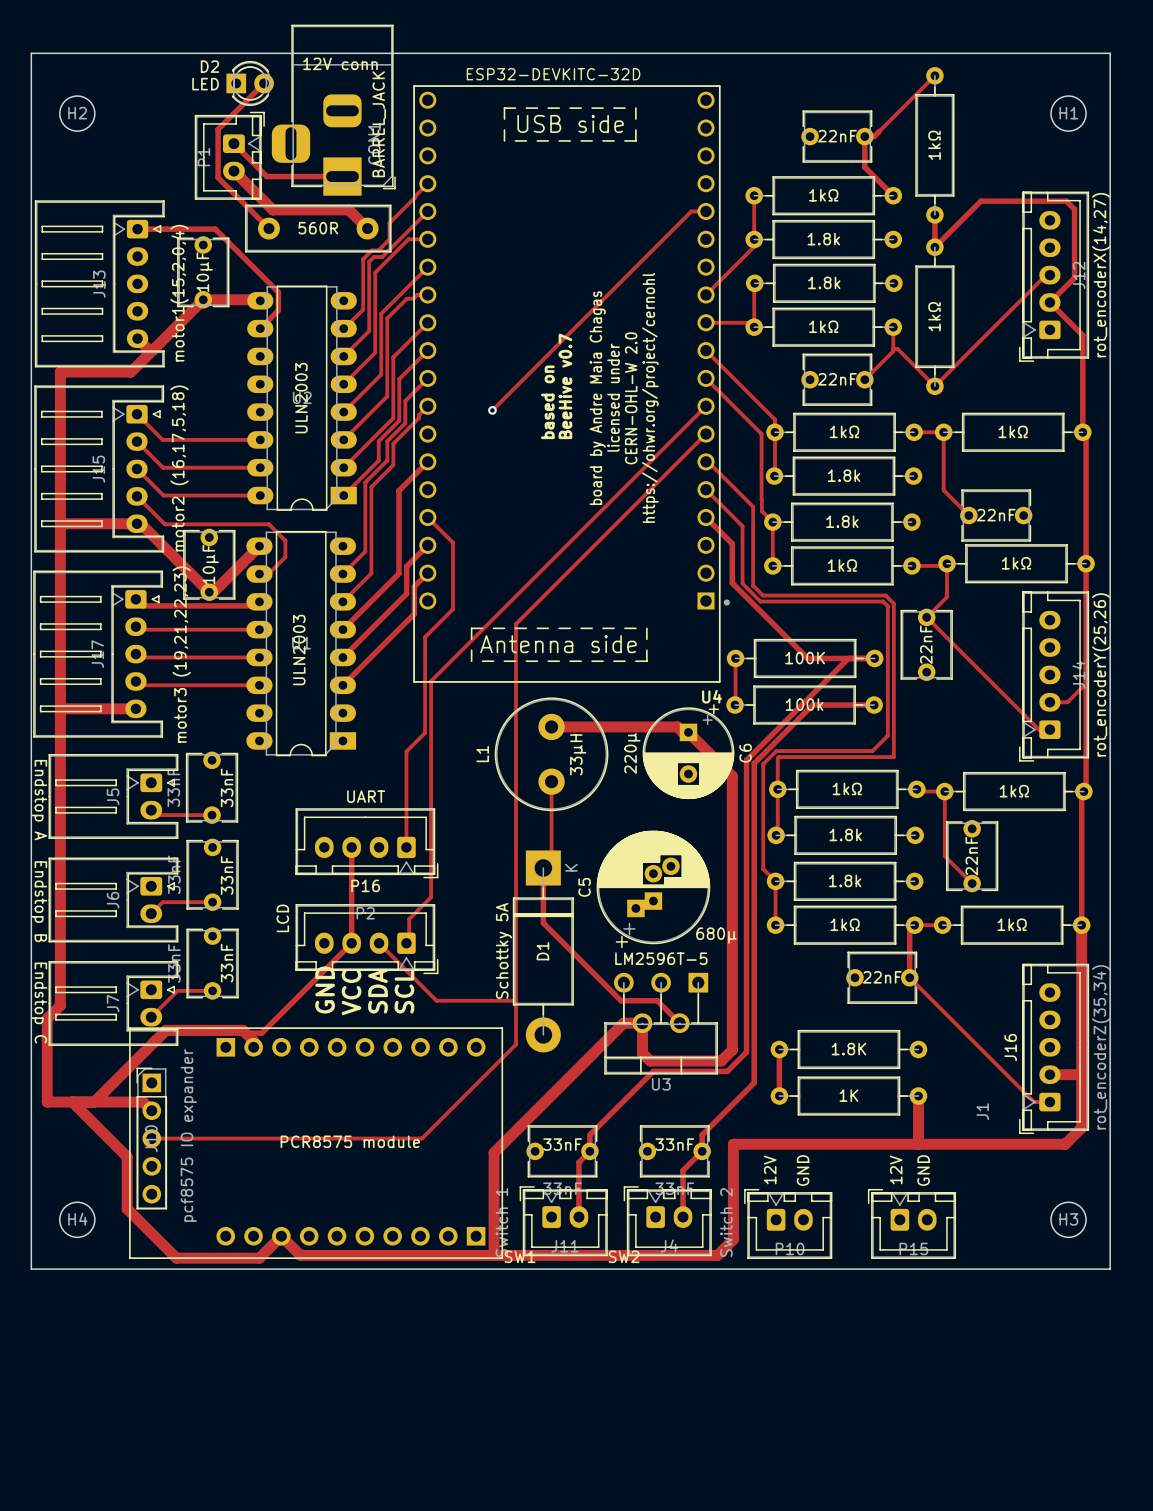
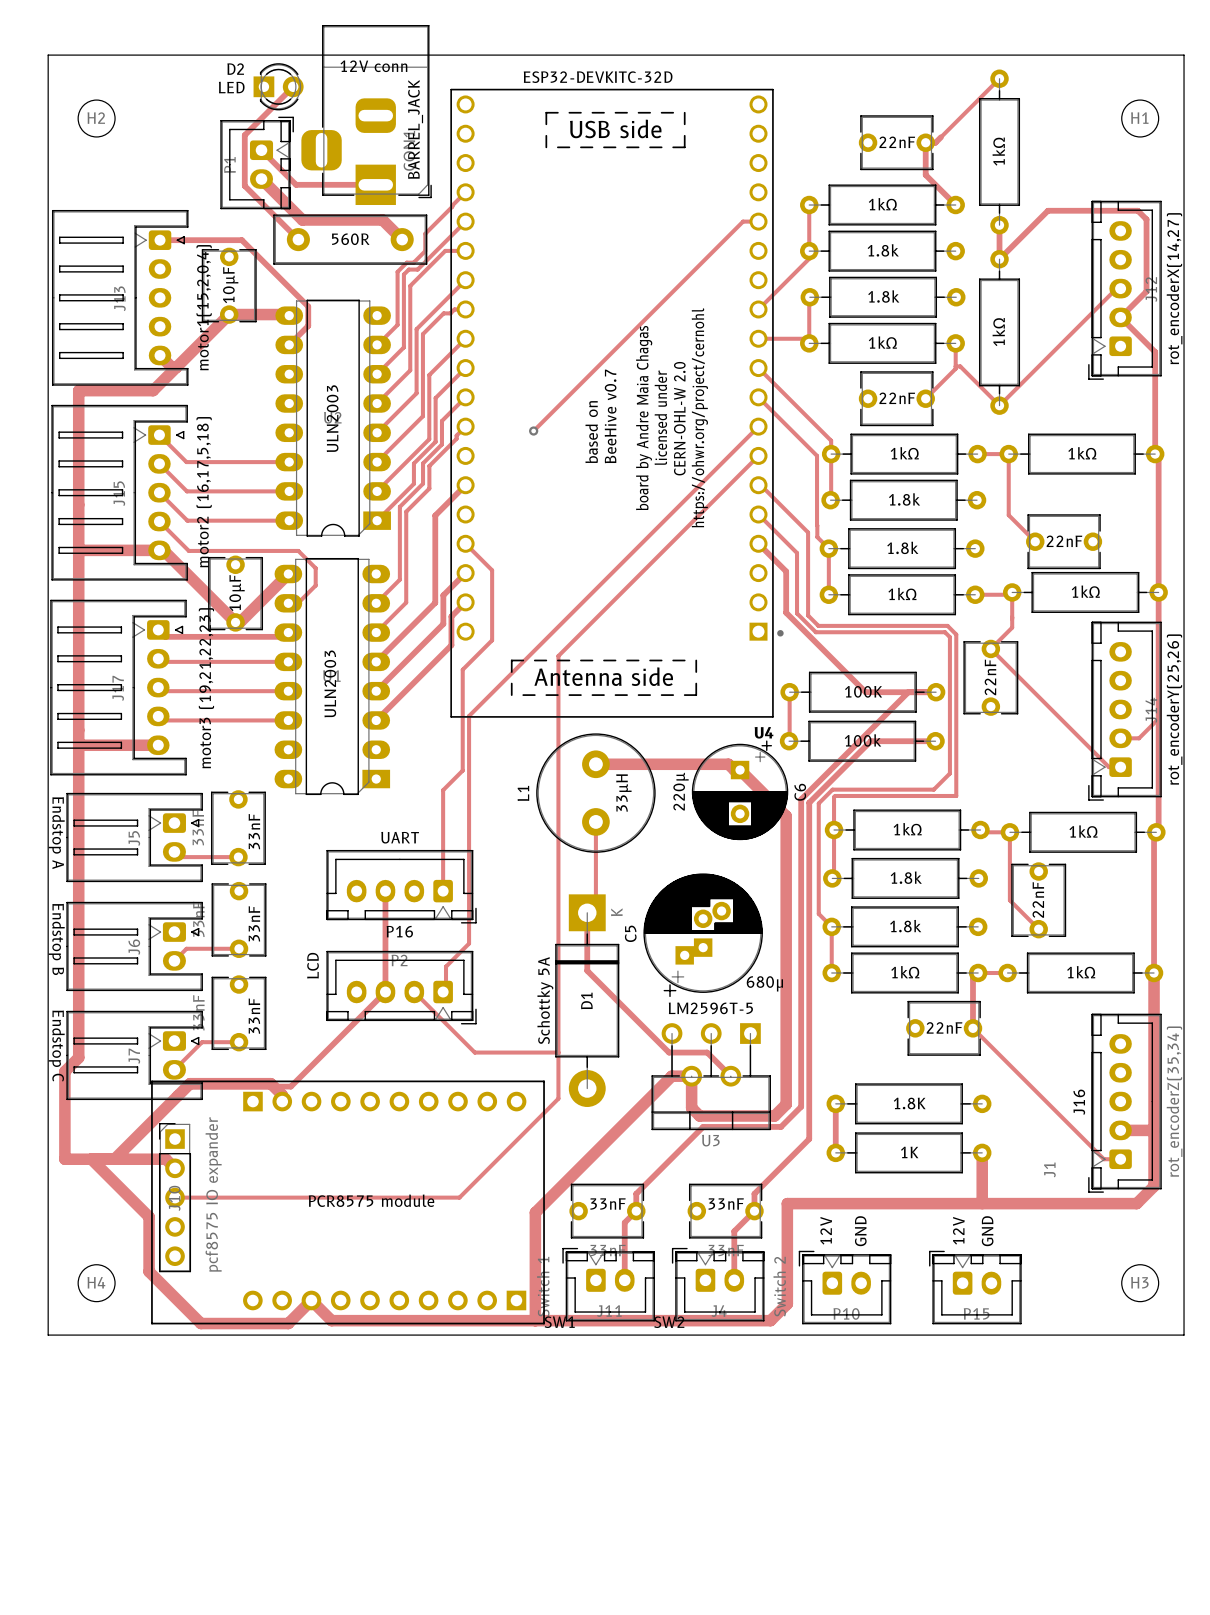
text: GND (325, 989) -> none
text: SDA (377, 991) -> none
text: SCL (404, 991) -> none
text: VCC (351, 992) -> none

